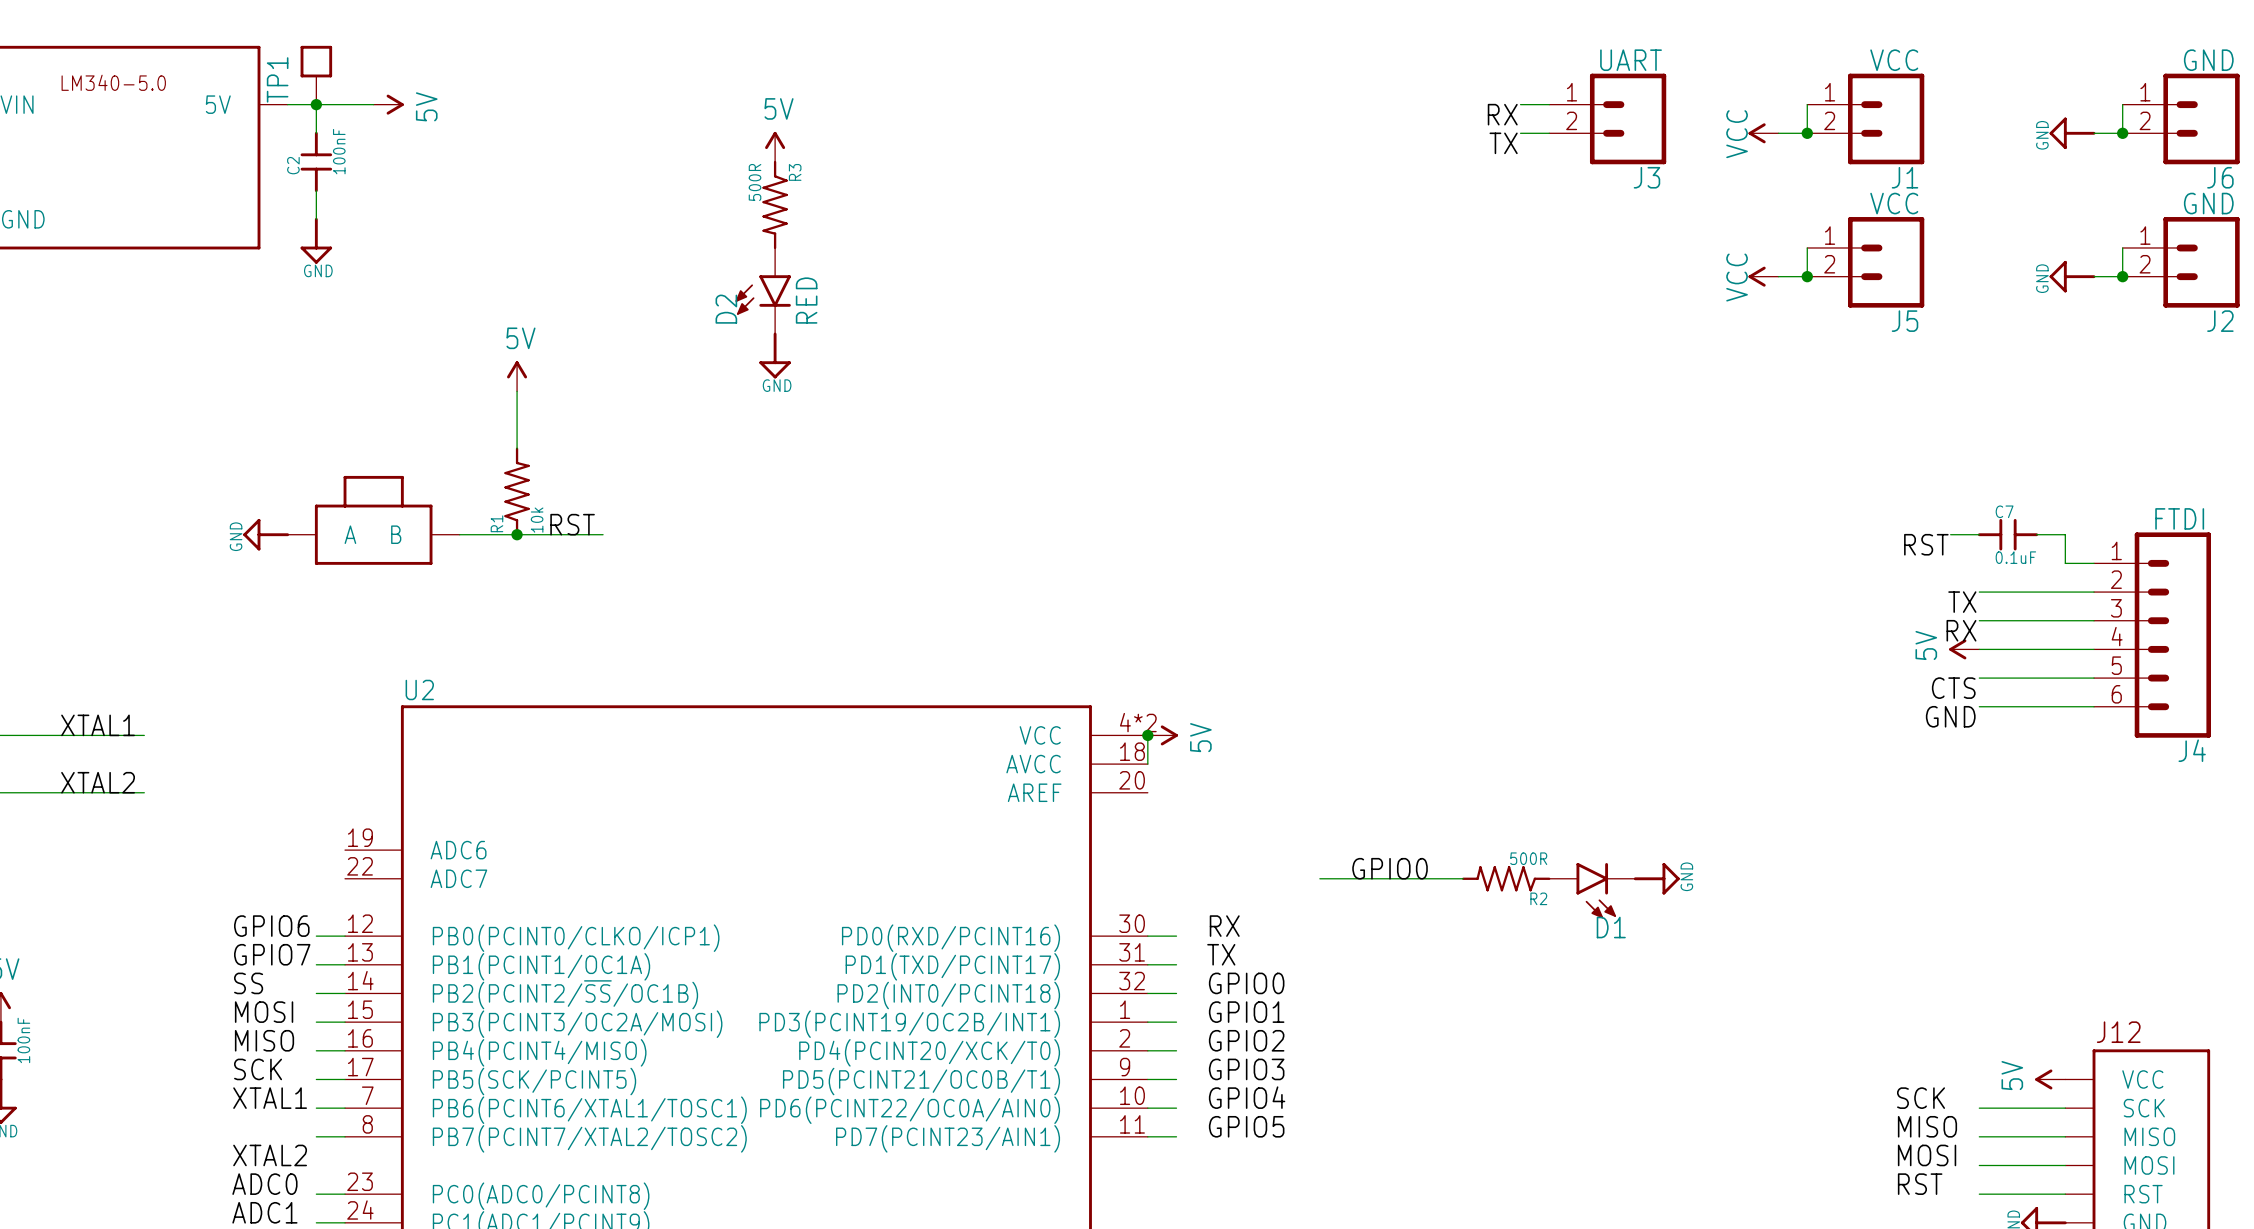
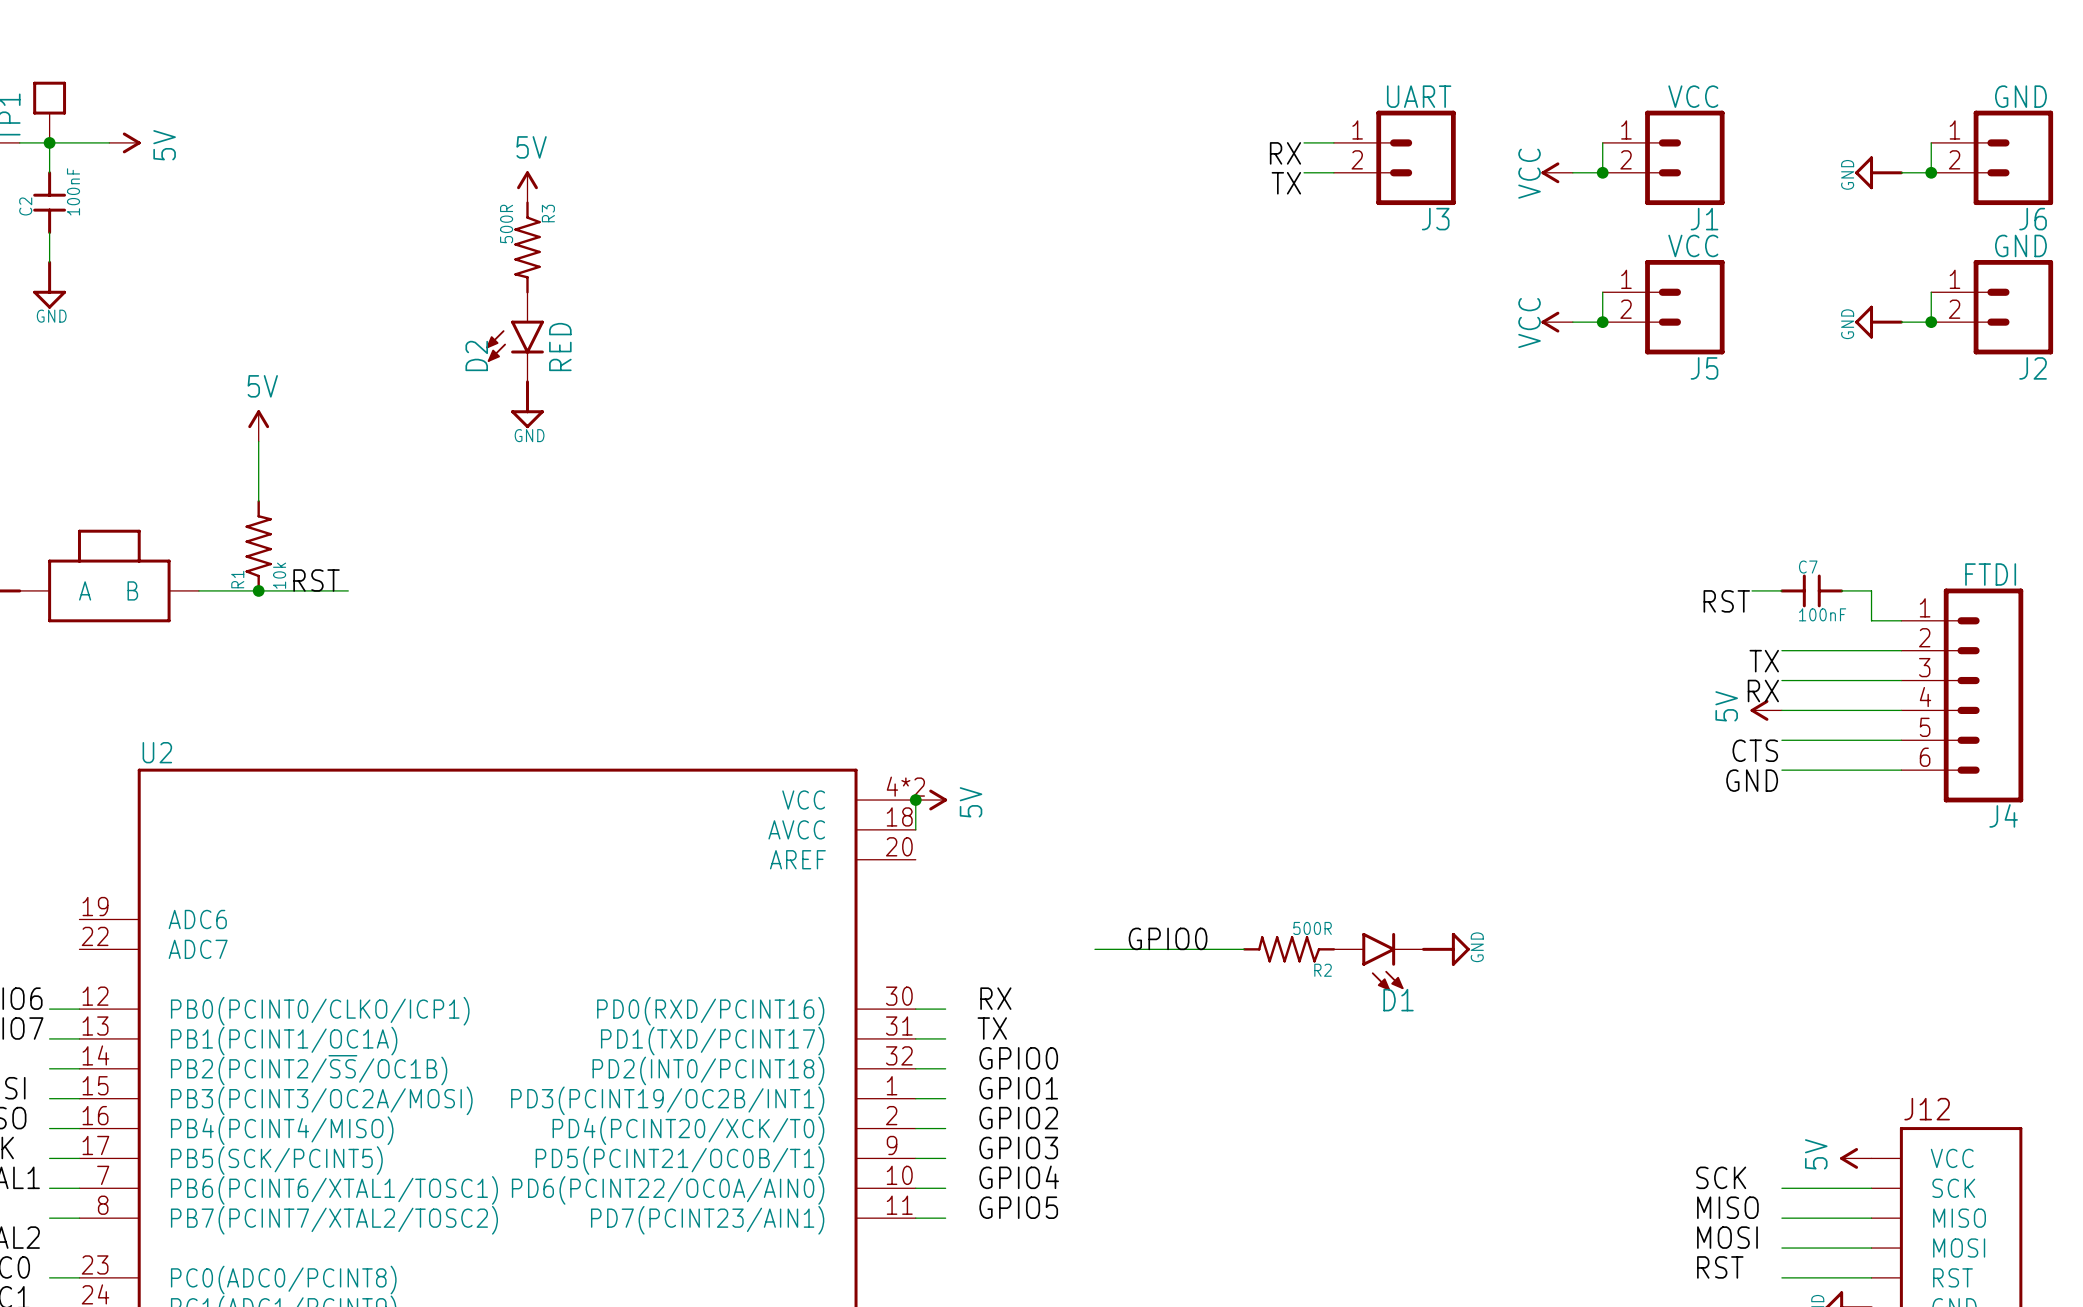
C7 value: 0.1uF (2015, 557) -> 100nF (1822, 614)

